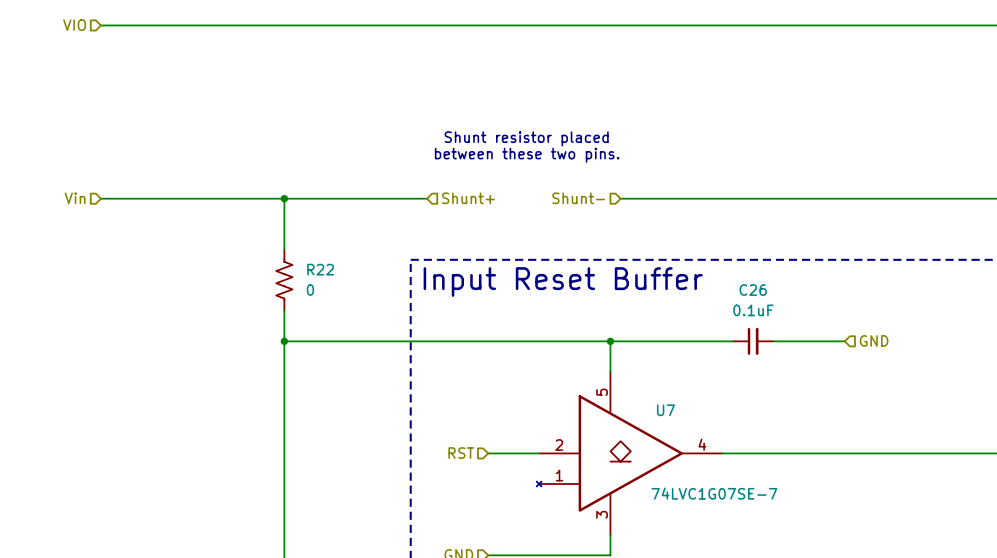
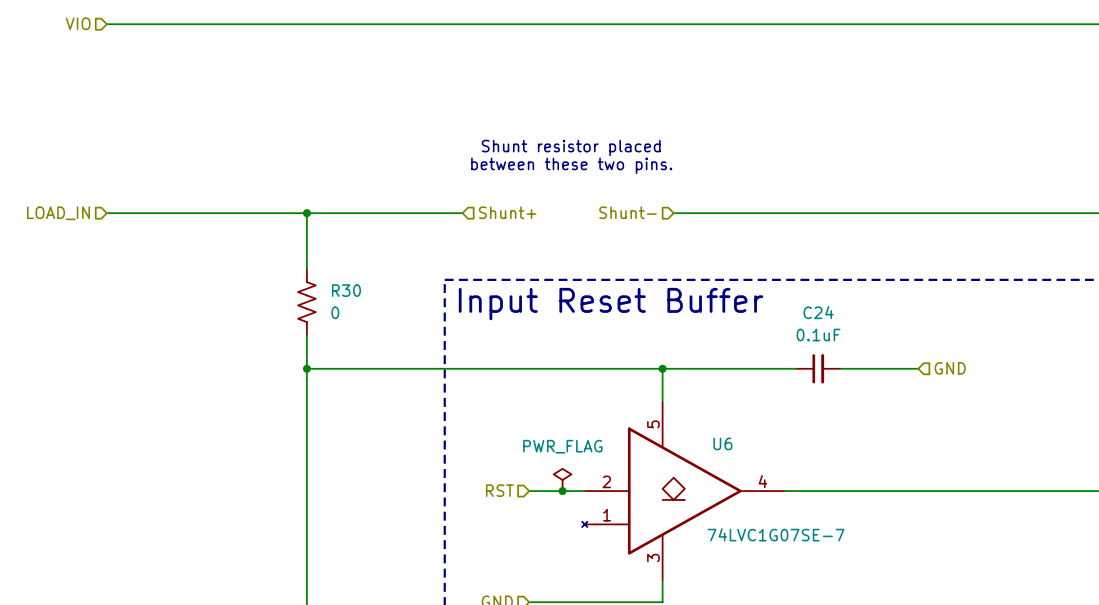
hierarchical label: Vin (75, 198) -> LOAD_IN (58, 213)
R22 name: R22 (320, 269) -> R30 (346, 290)
C26 name: C26 (753, 290) -> C24 (818, 312)
U7 name: U7 (665, 410) -> U6 (722, 443)
power symbol: none -> PWR_FLAG (562, 479)
junction: none -> (562, 491)

